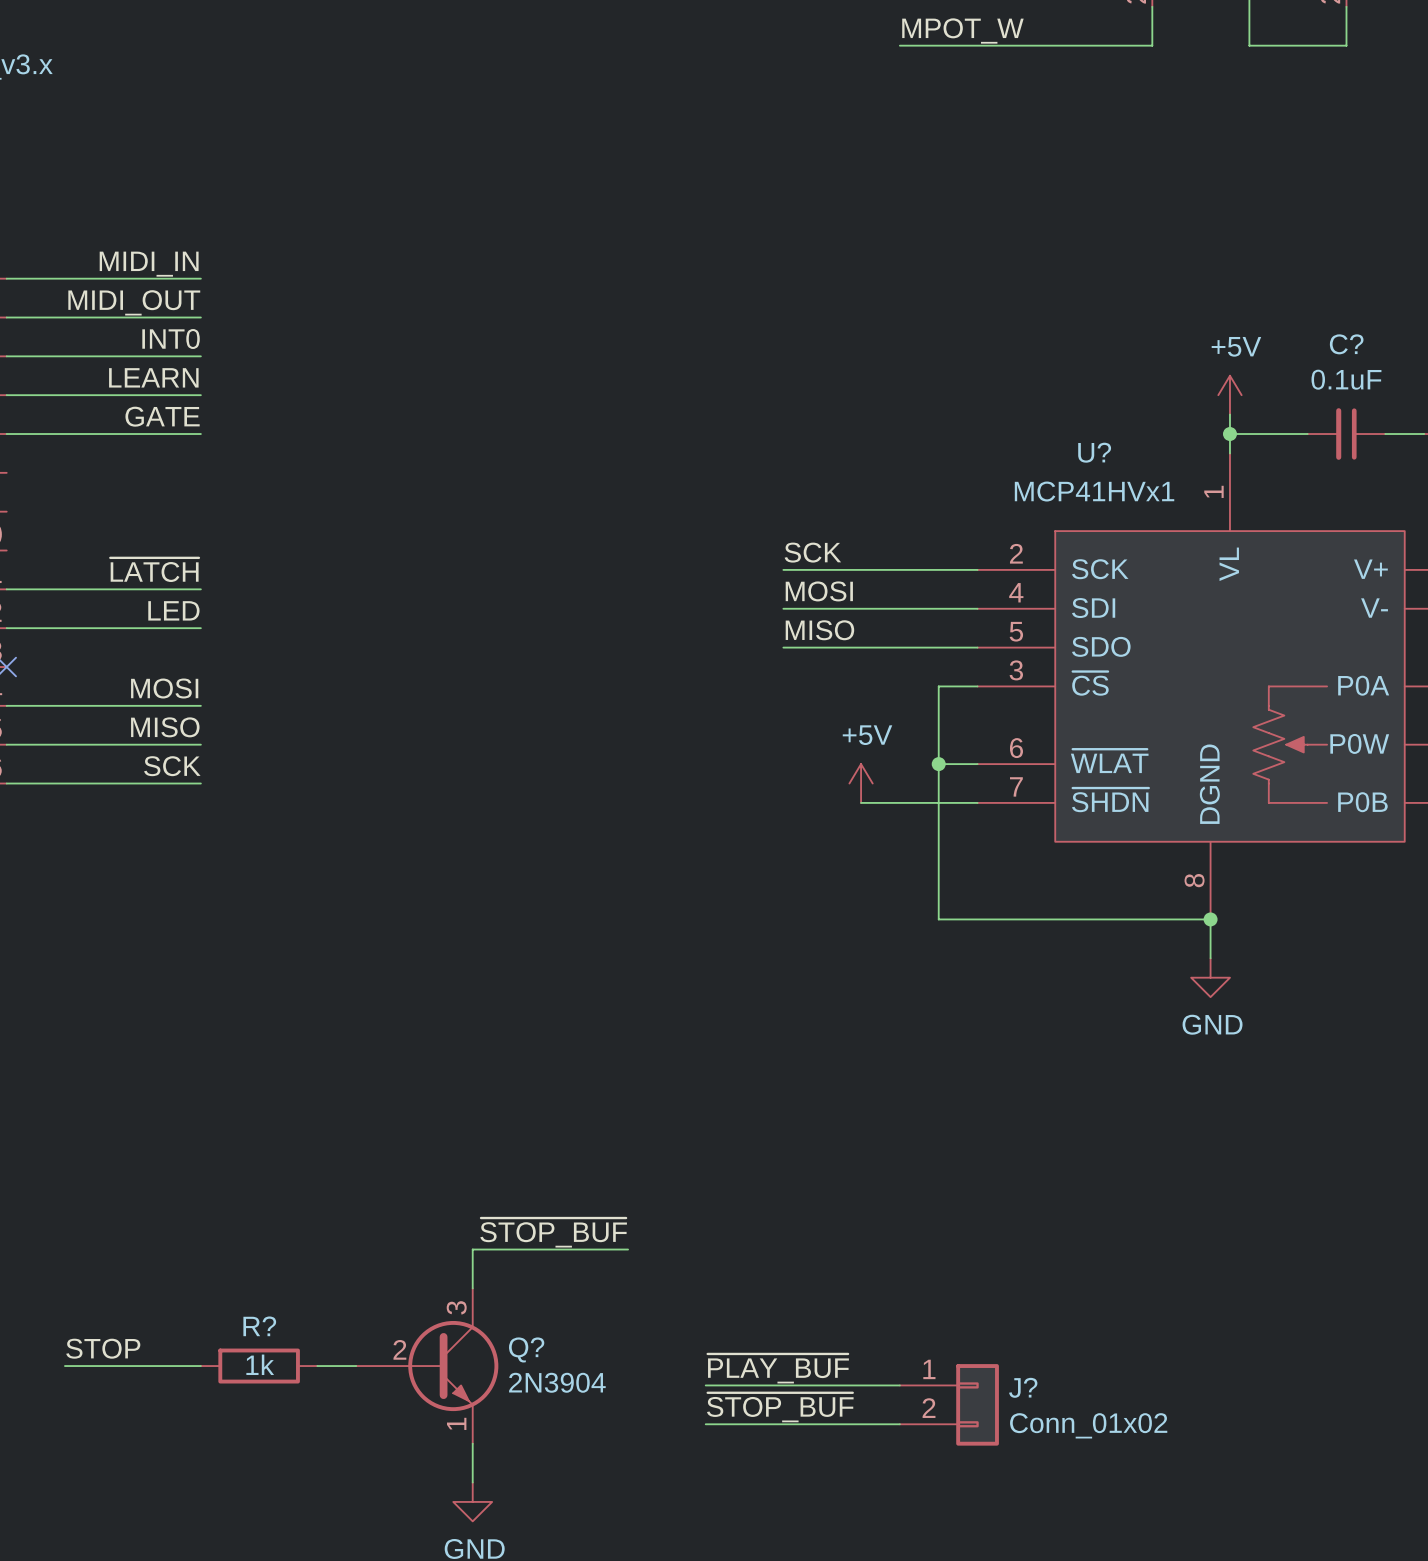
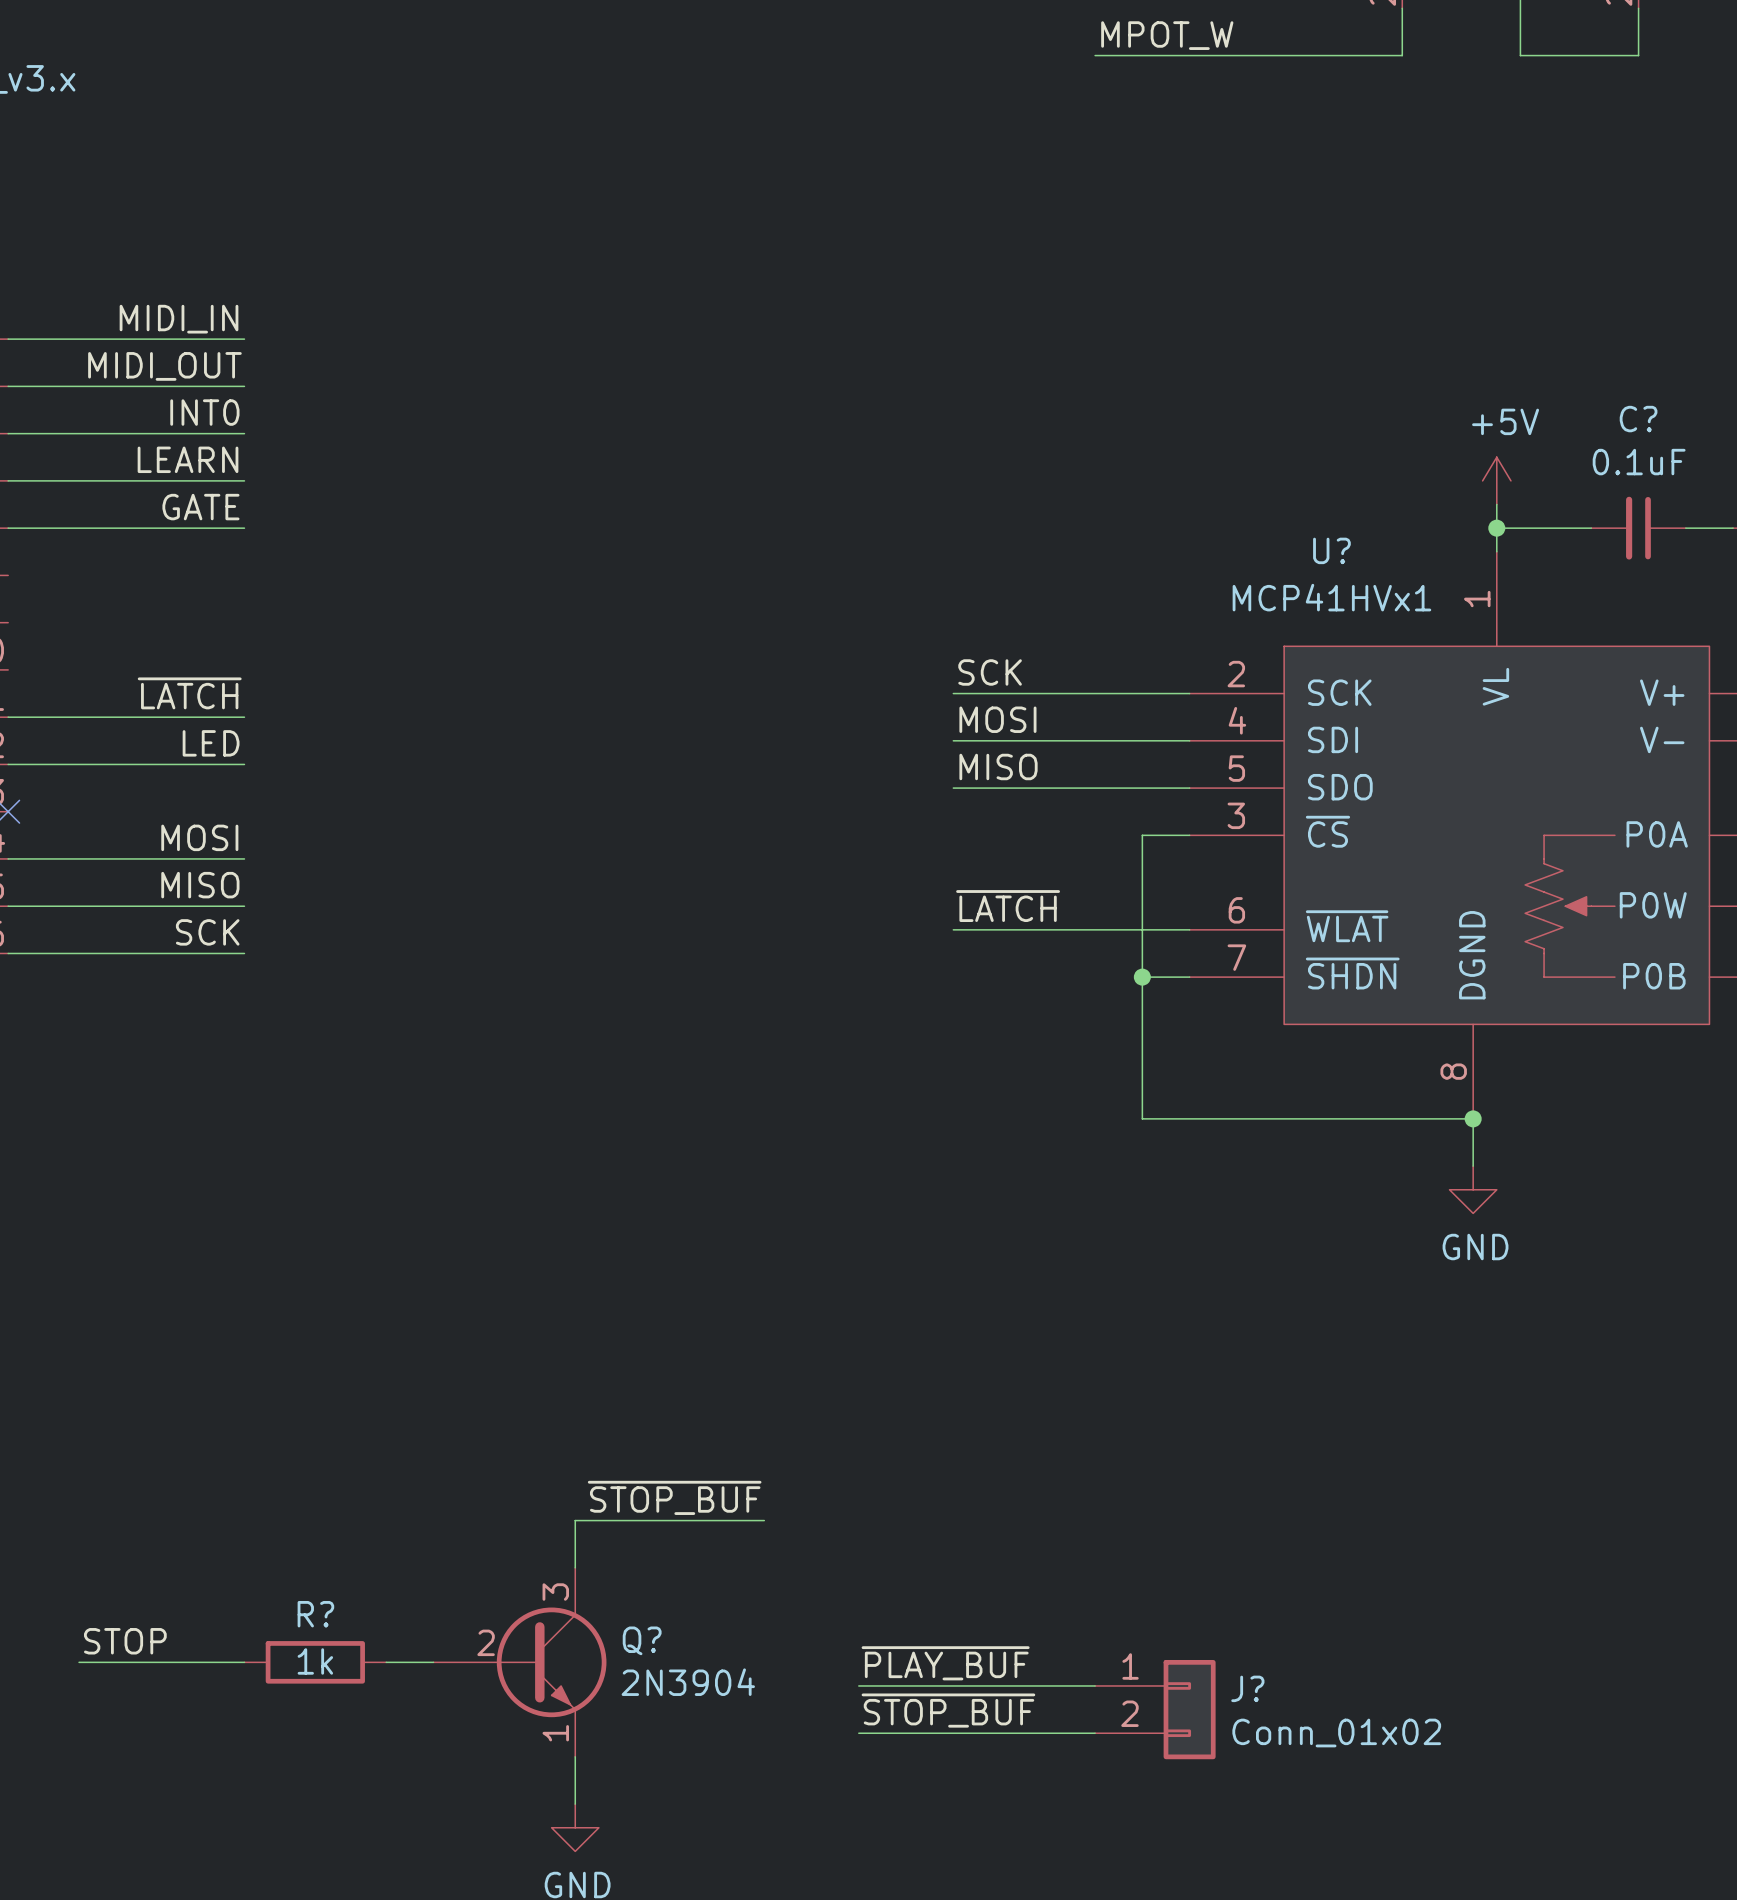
label: none -> ~{LATCH} (1008, 906)
wire: none -> (953, 929) (1142, 929)
junction position: (938, 764) -> (1142, 977)
power symbol: +5V (861, 783) -> none
wire: (861, 802) (938, 802) -> none

